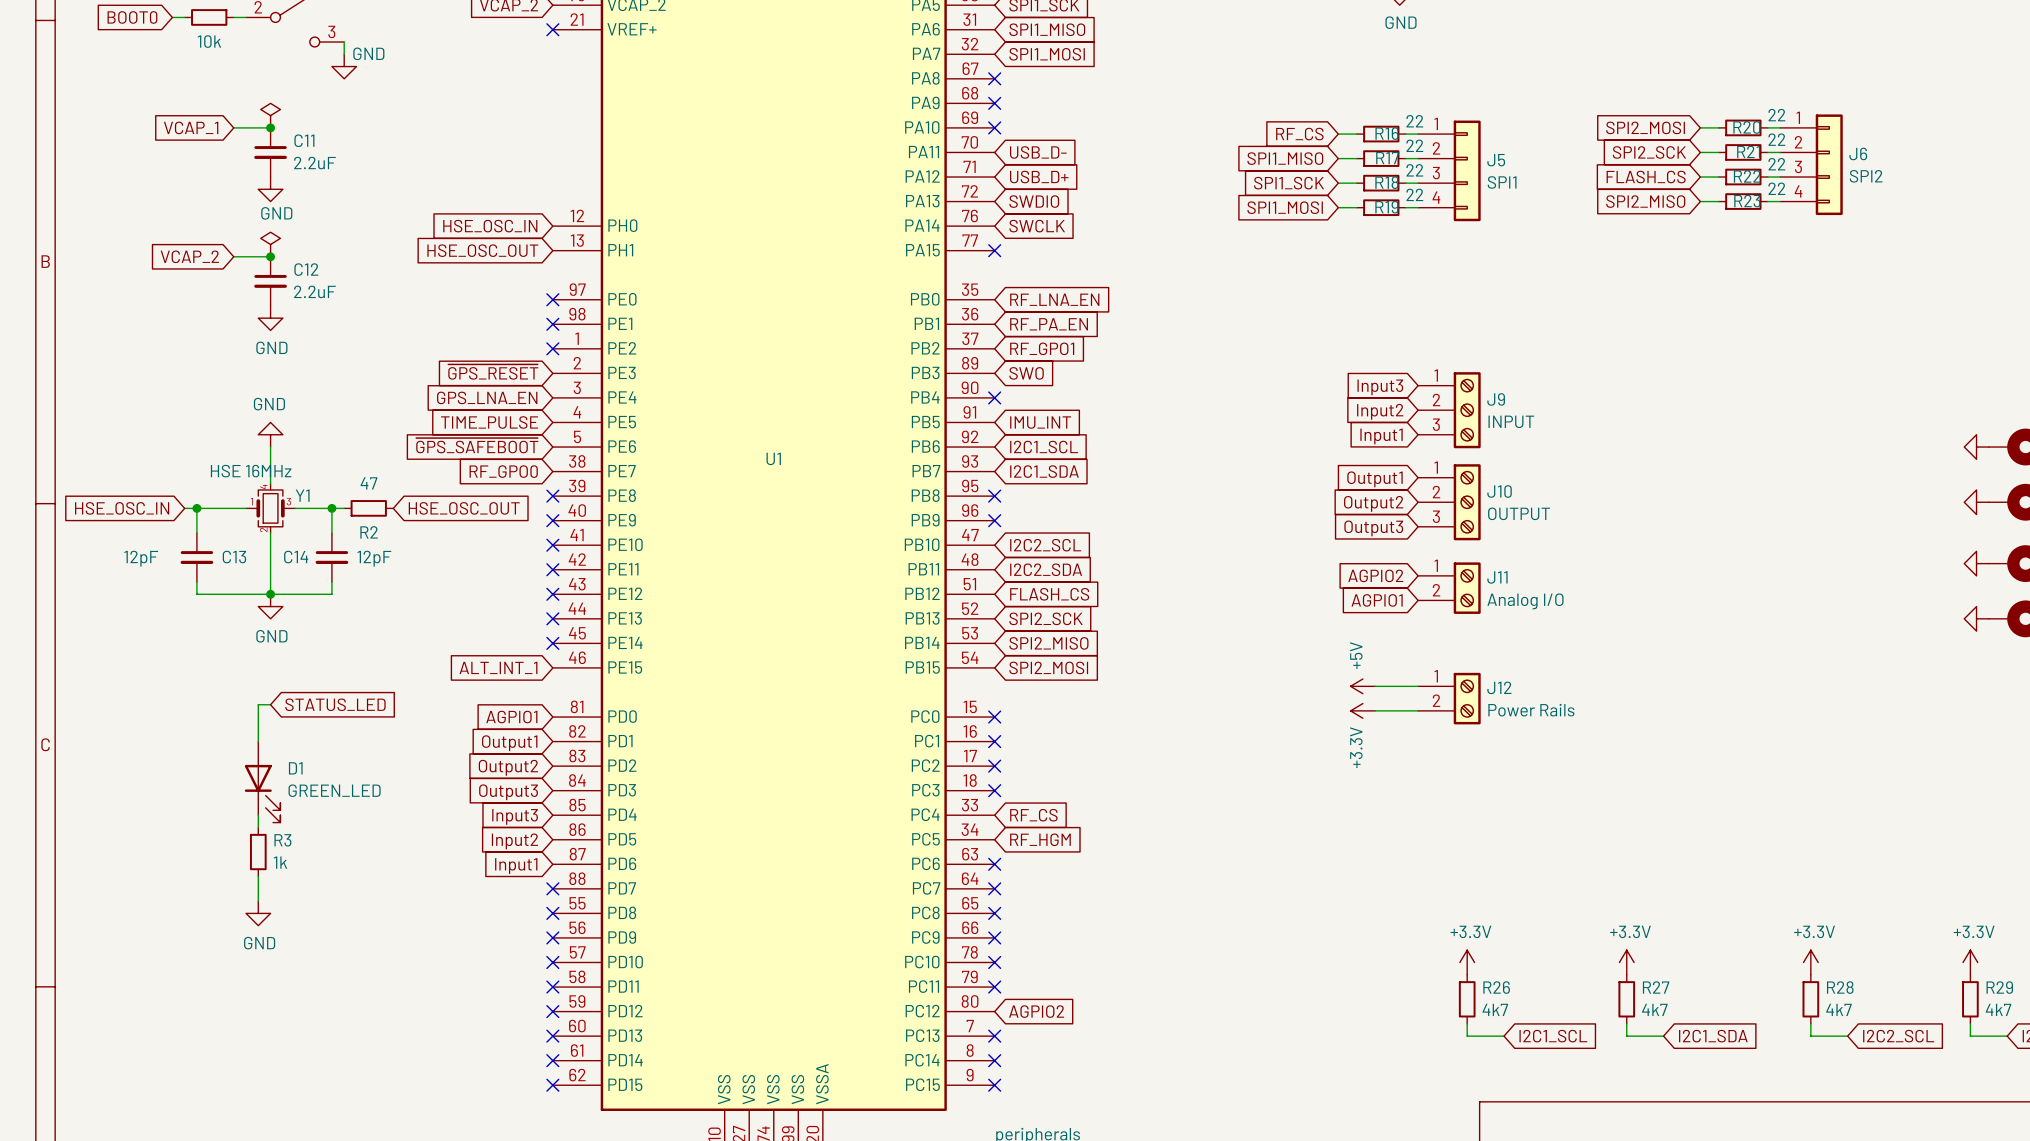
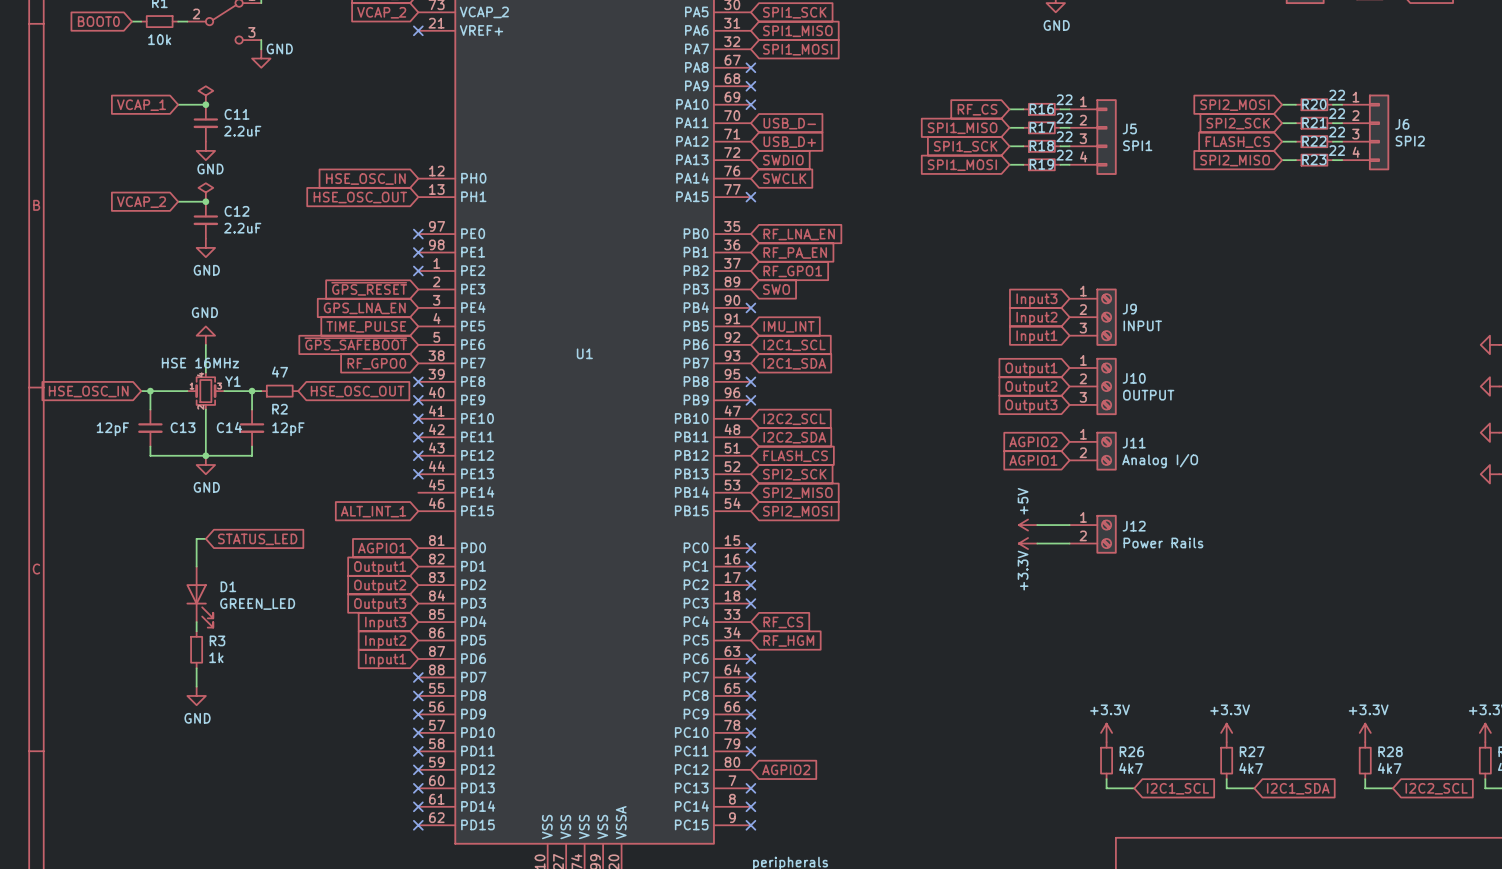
no-connect mark: (552, 643) -> none

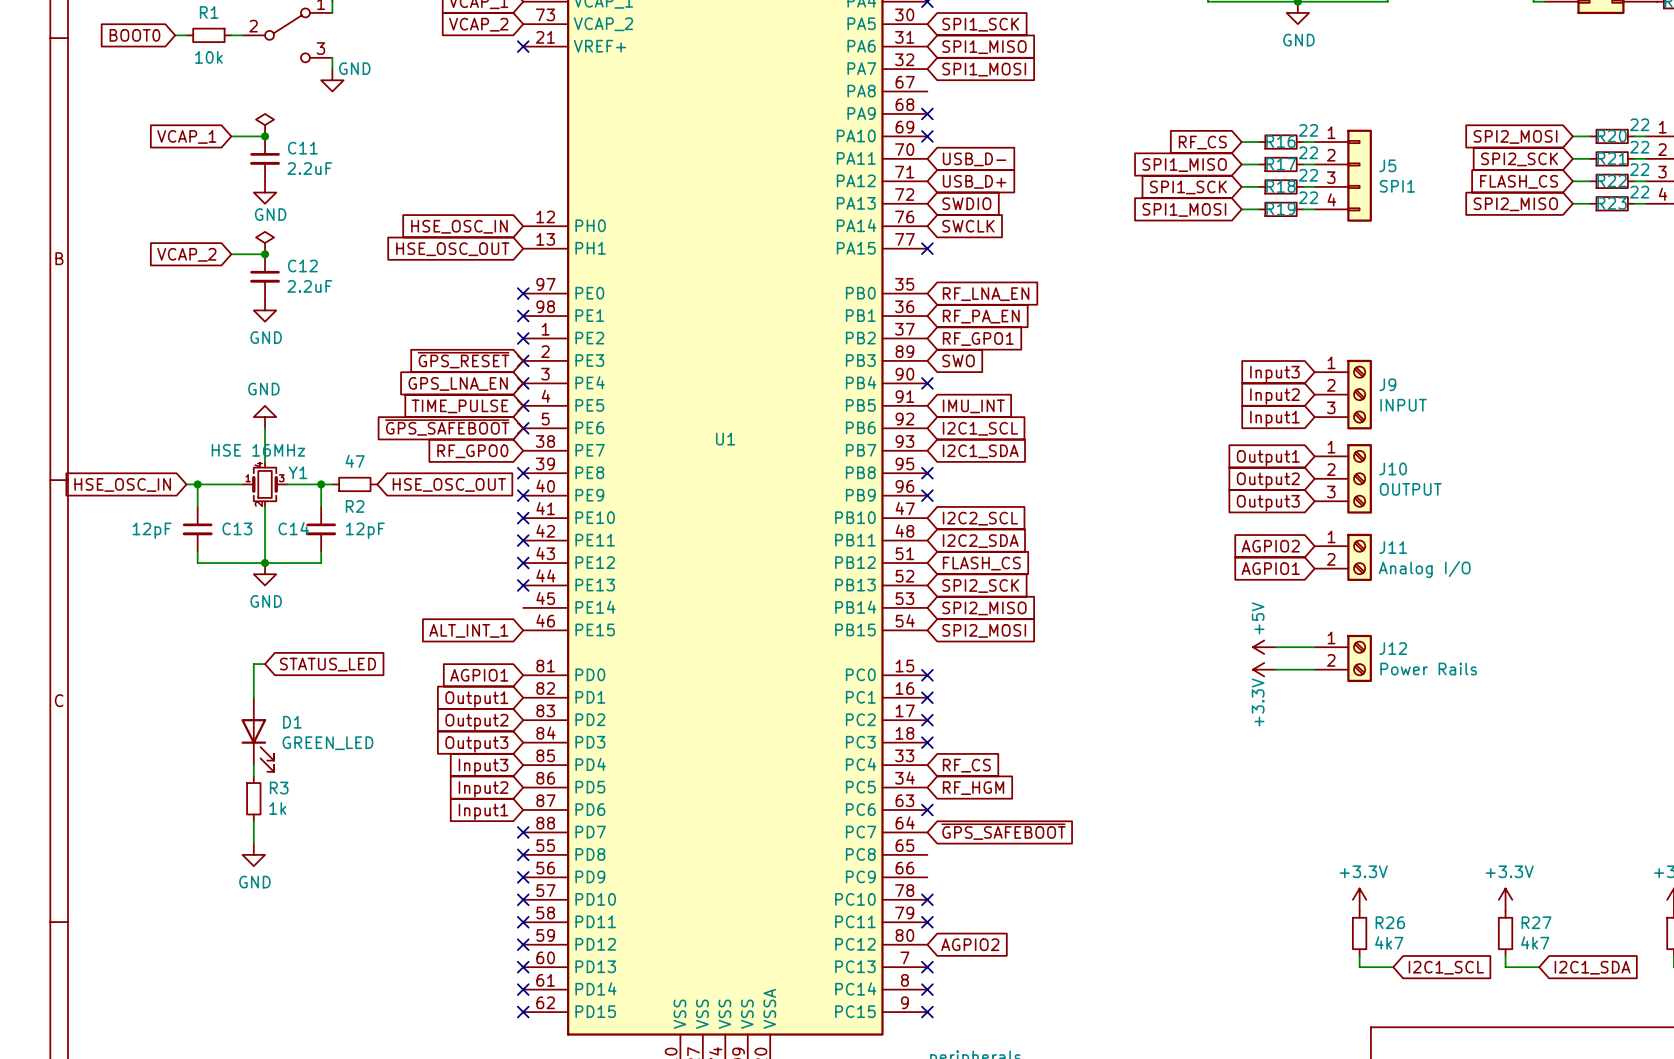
no-connect mark: (750, 67) -> none
no-connect mark: none -> (523, 360)
no-connect mark: none -> (523, 383)
no-connect mark: none -> (523, 405)
no-connect mark: none -> (523, 428)
global label: none -> ~{GPS_SAFEBOOT} (1003, 831)
no-connect mark: (750, 677) -> none
no-connect mark: (750, 695) -> none
no-connect mark: (750, 714) -> none

